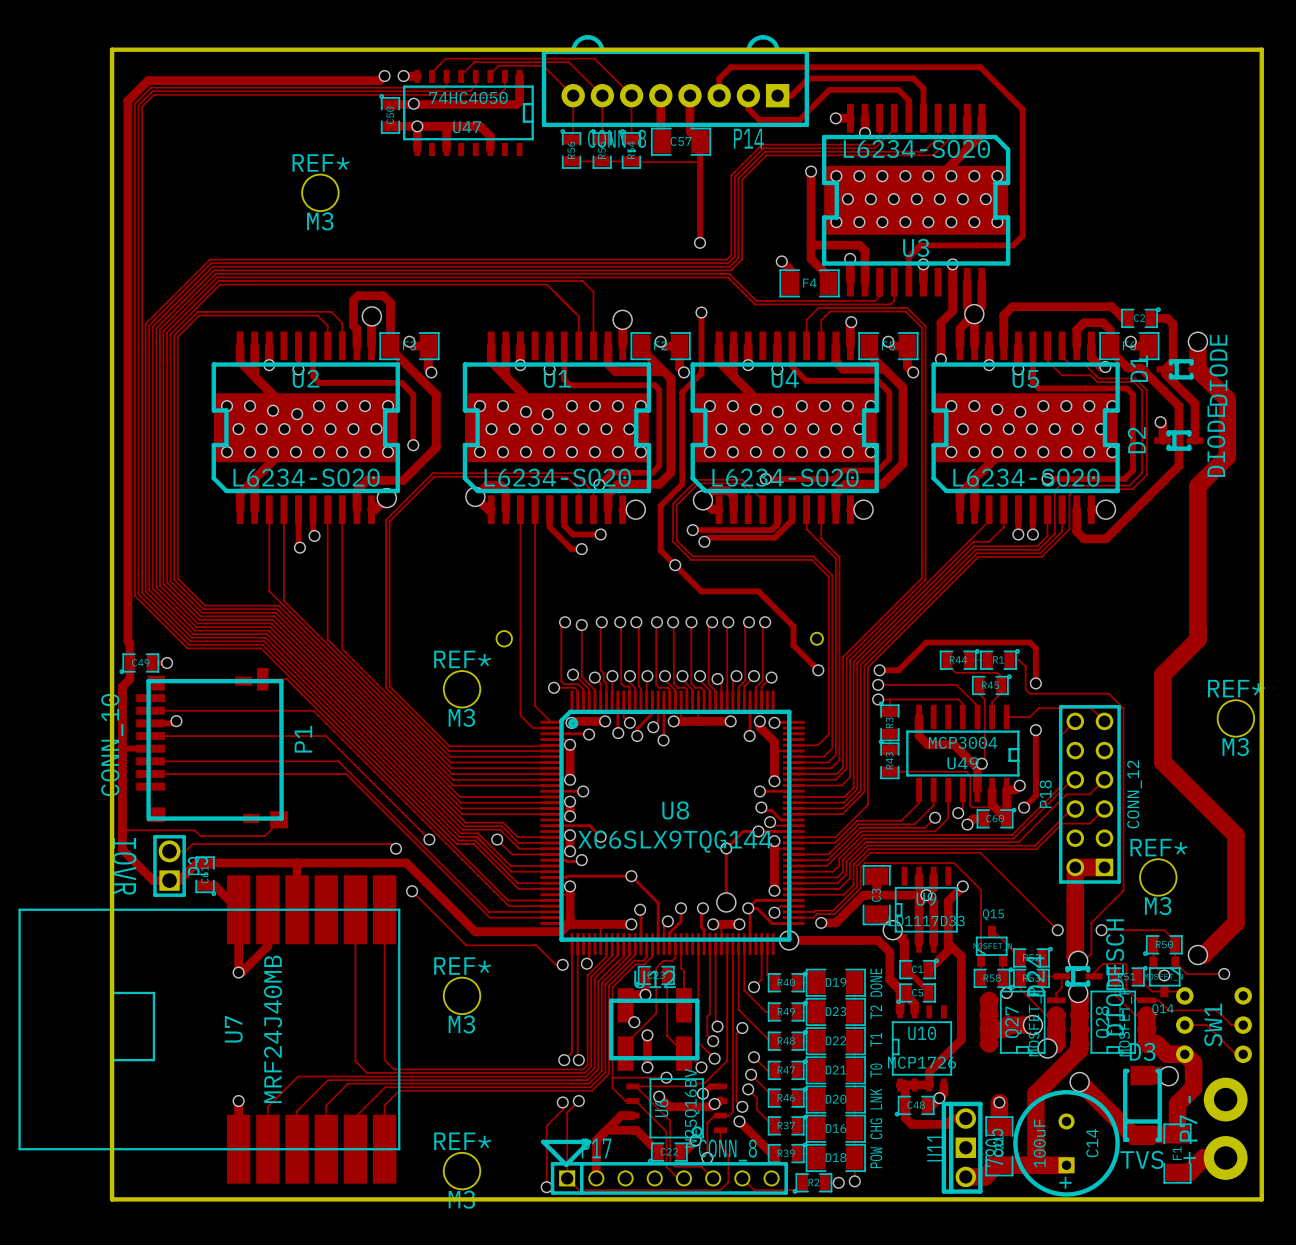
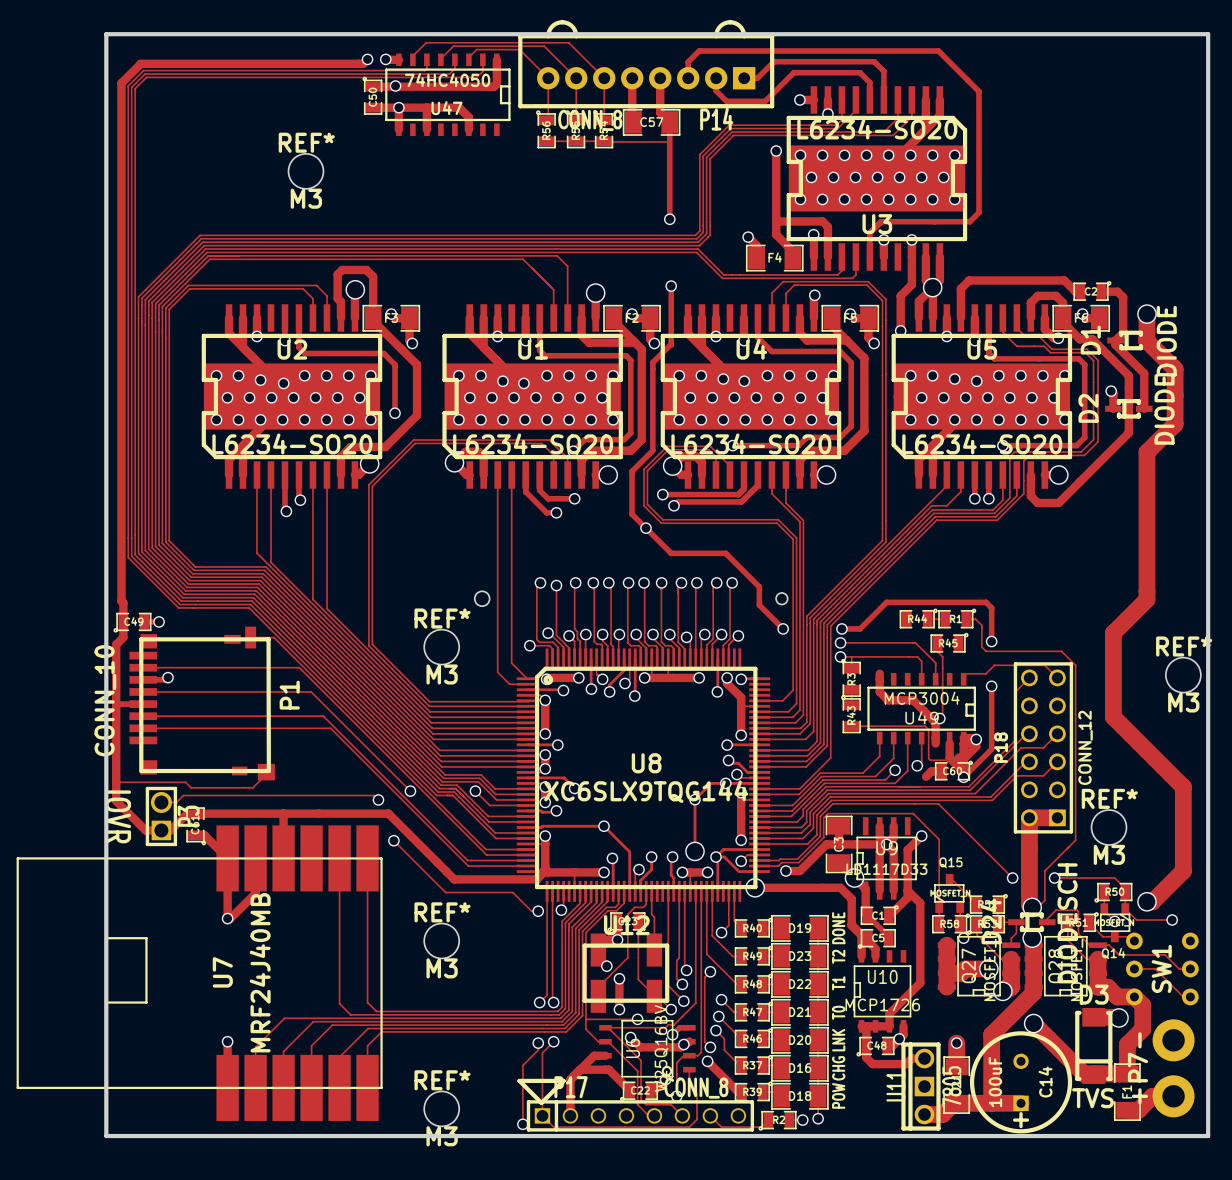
track: (947, 660) (947, 664) (955, 672) (997, 672) (1001, 676) (1001, 692) (992, 702) (992, 717) -> none
U49 footprint: [906, 704, 1020, 803] -> [867, 673, 976, 745]
track: none -> (963, 738) (974, 738) (976, 746) (965, 757) (958, 757)
track: none -> (980, 760) (963, 777)
via: (1024, 807) -> none
via: (967, 824) -> none
via: none -> (963, 777)

